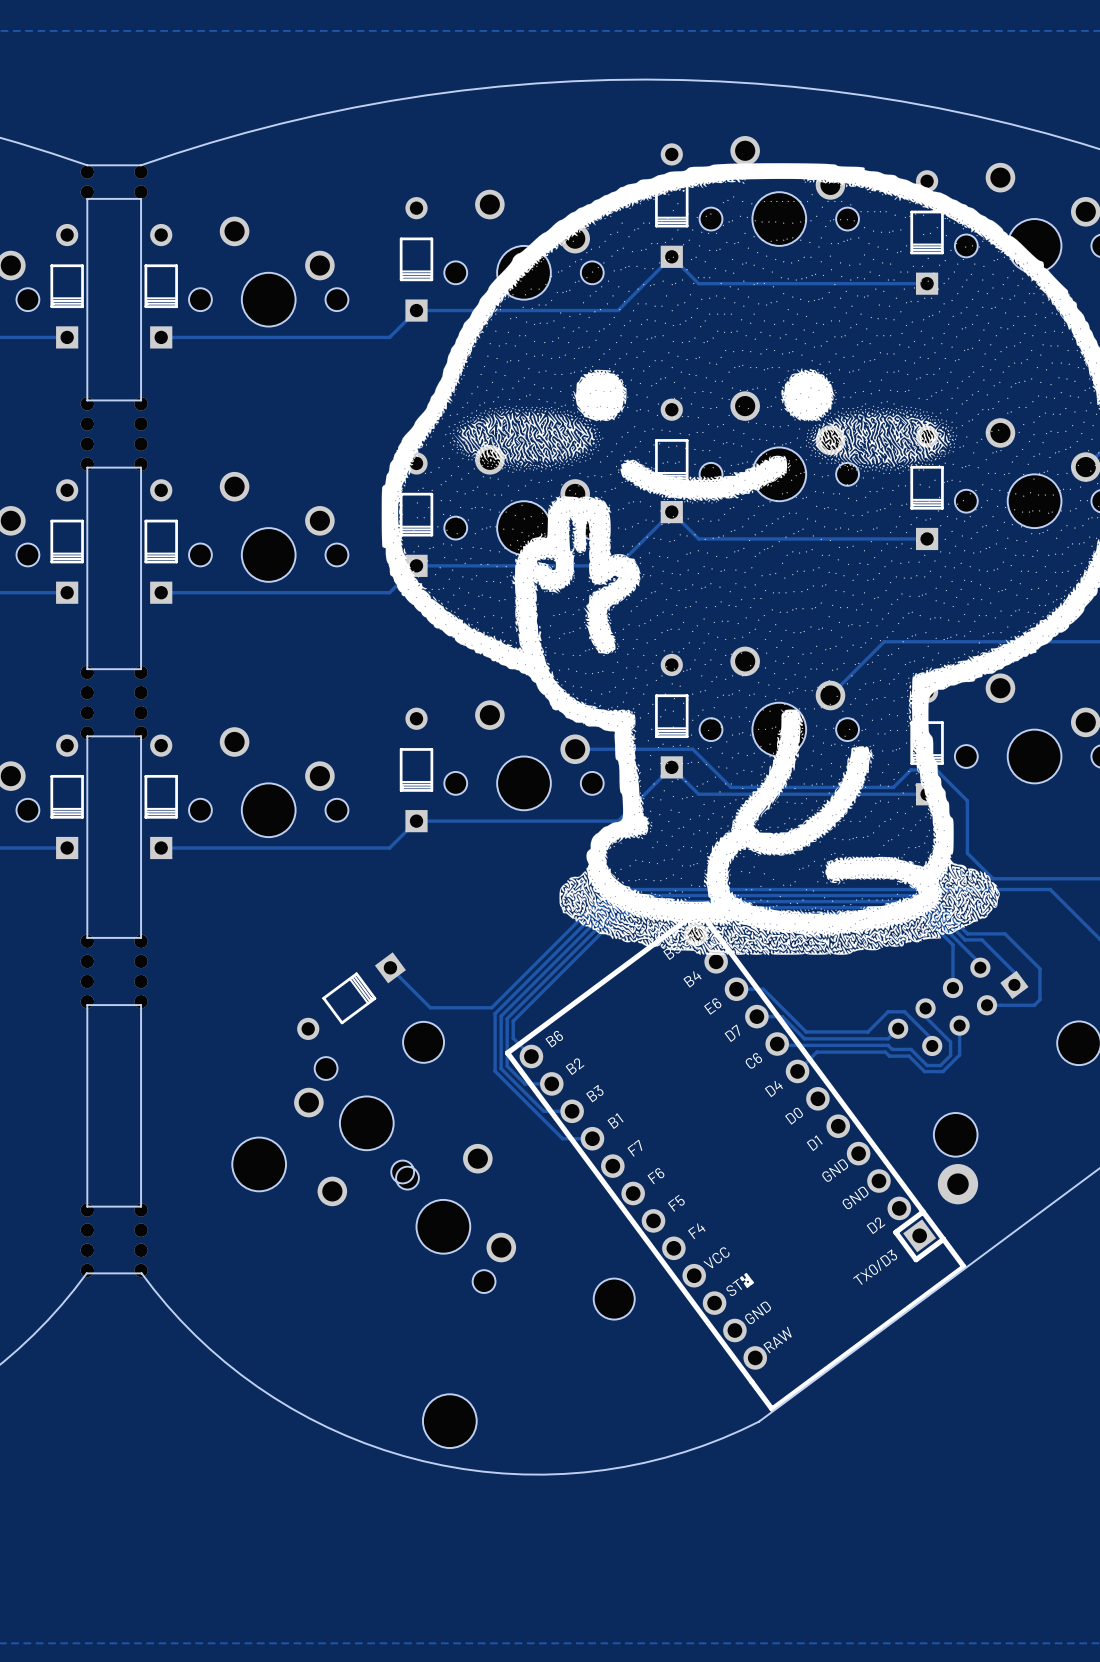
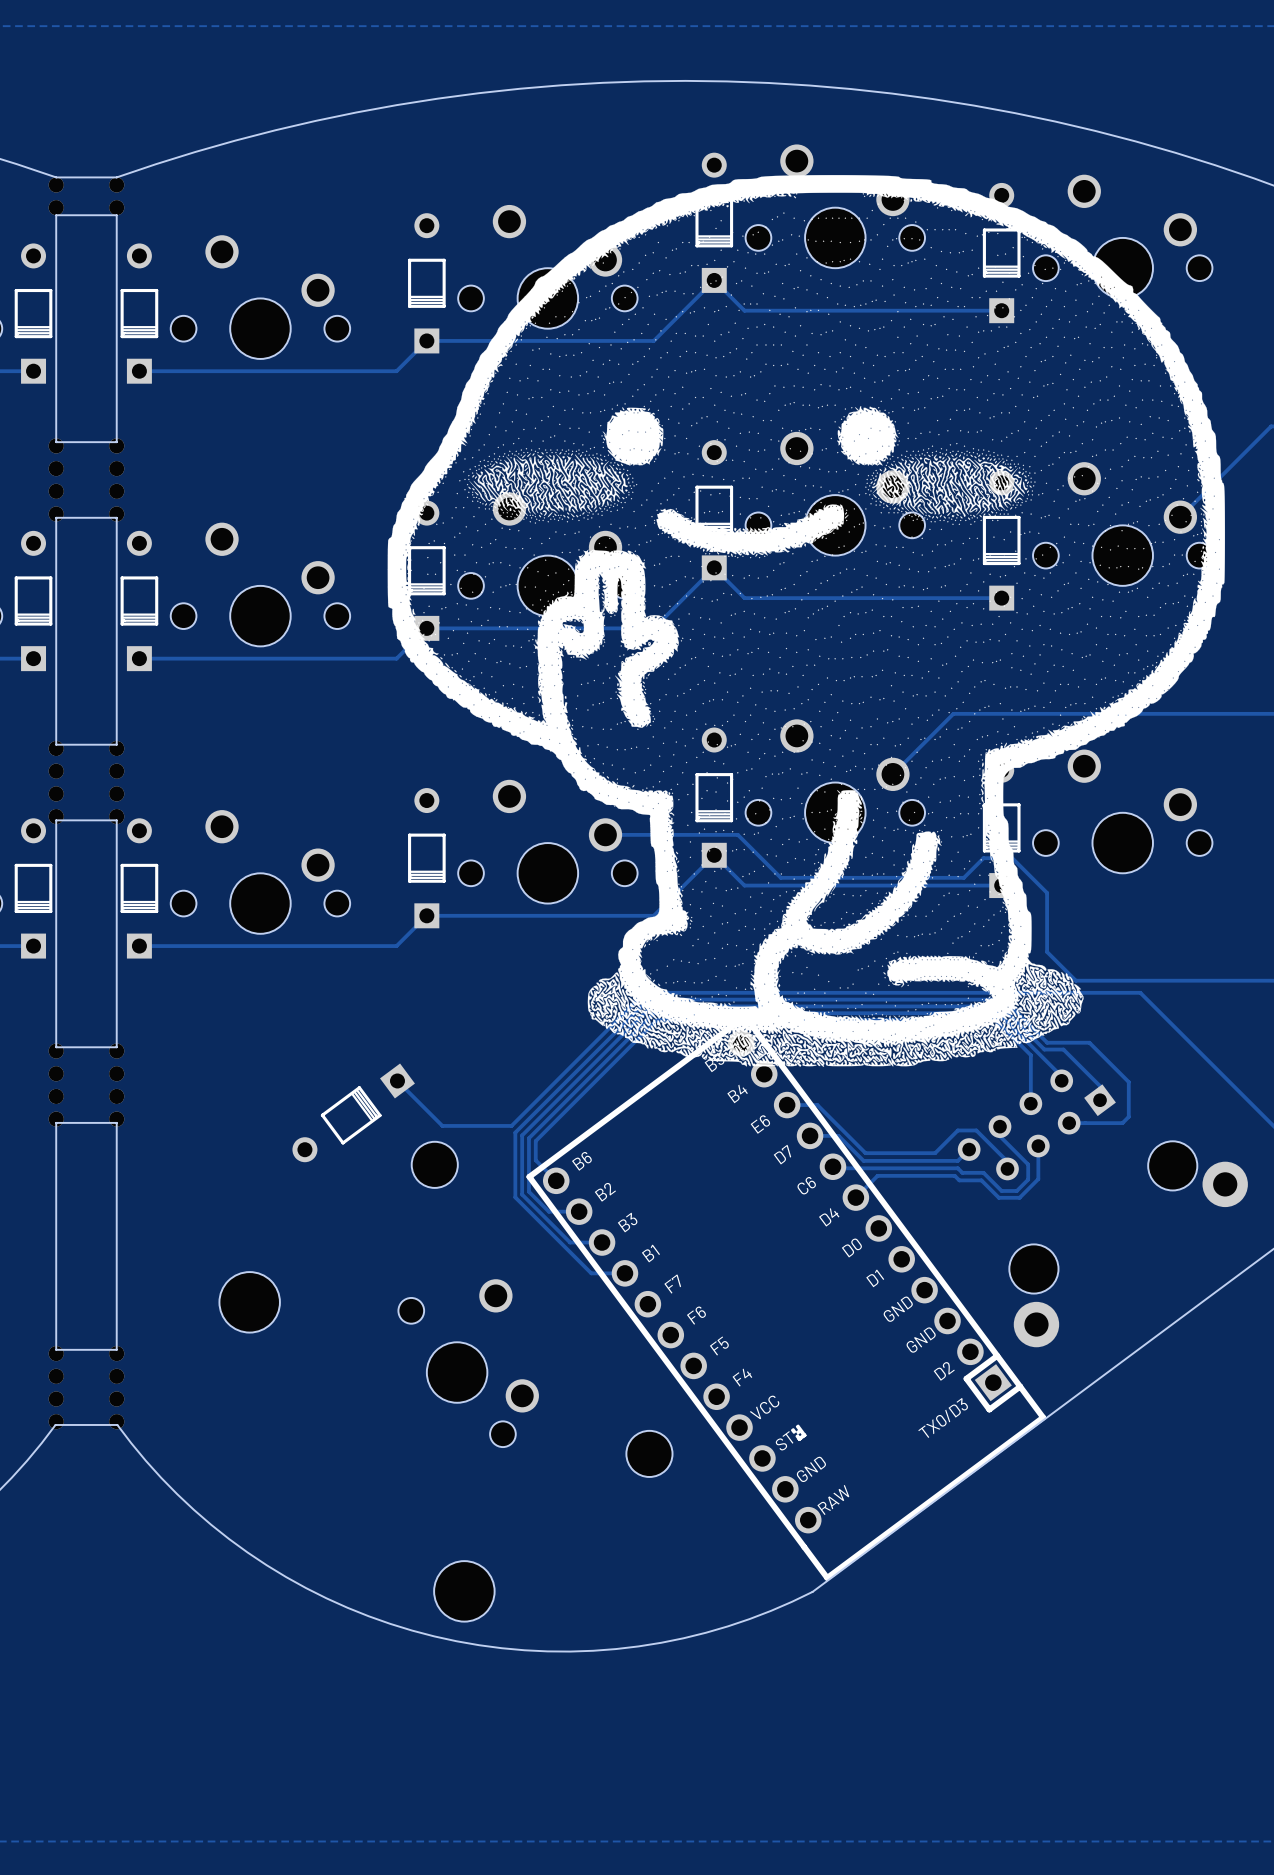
part: (356, 1131) -> none

